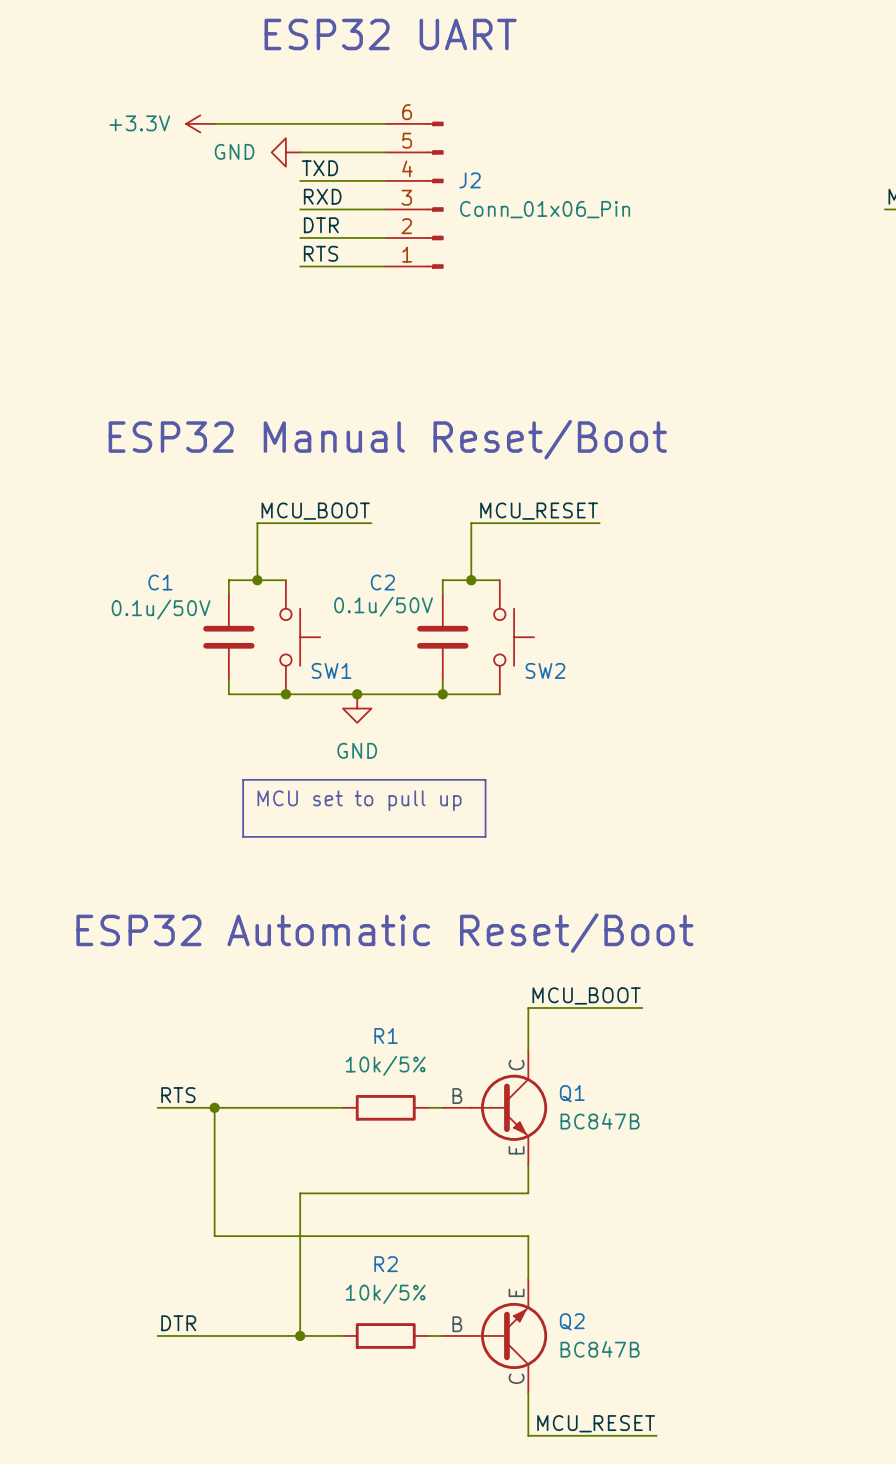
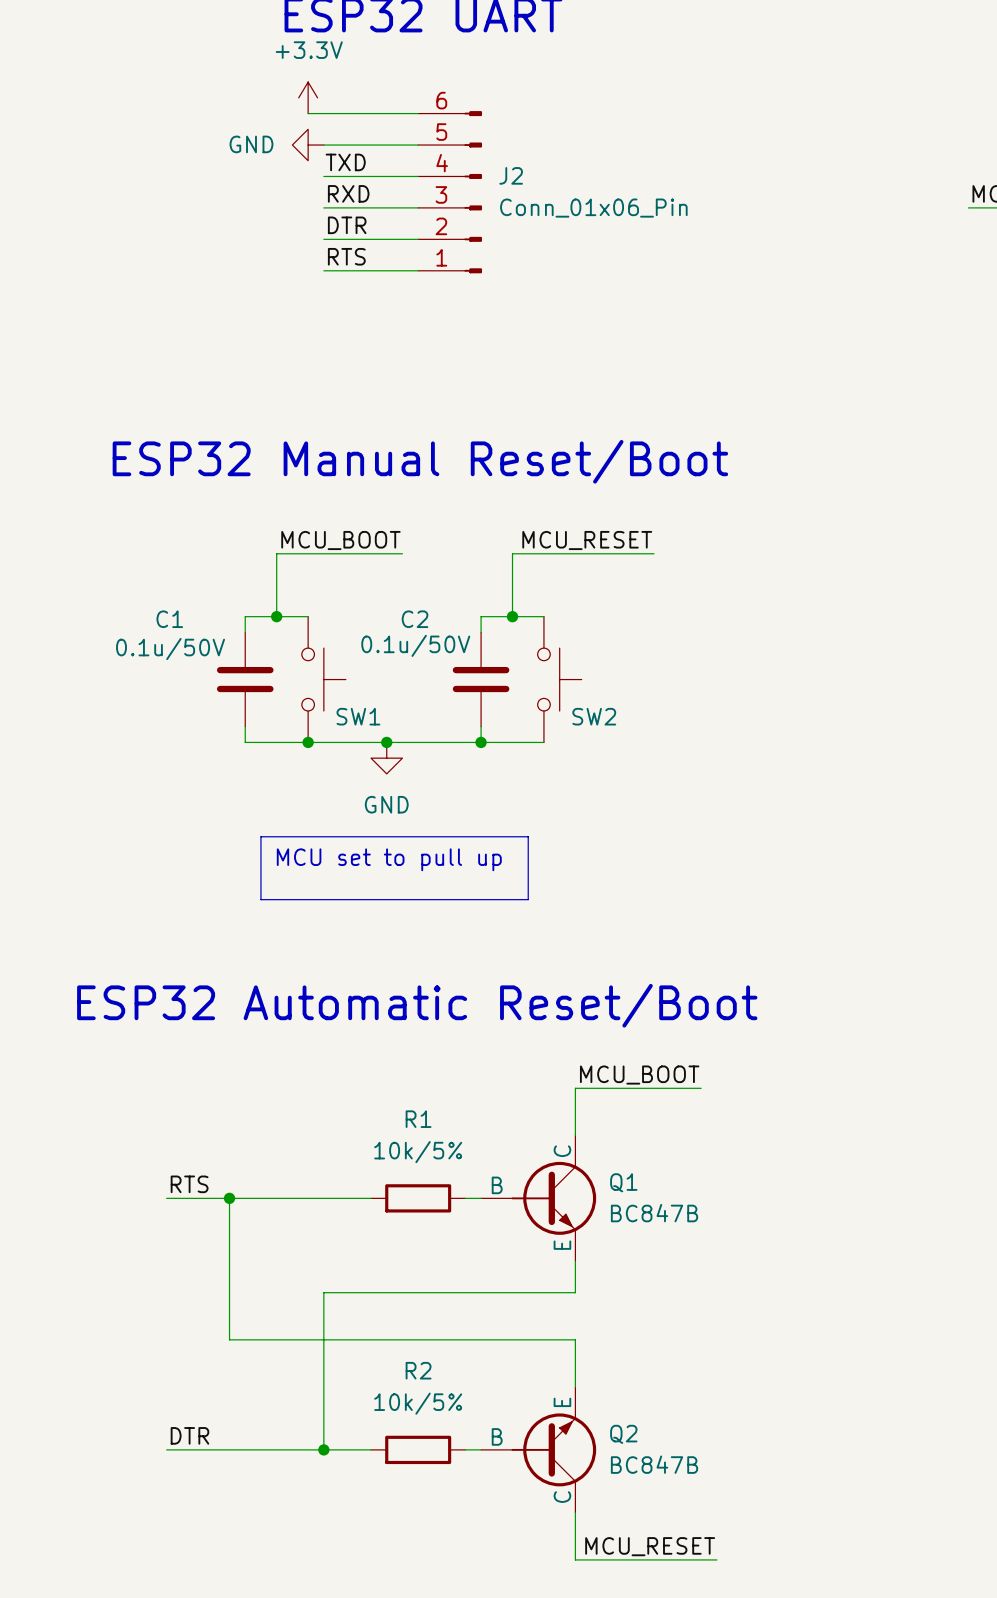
power symbol text position: +3.3V (139, 123) -> +3.3V (309, 50)
power symbol rotation: 0° (200, 123) -> 90° clockwise (308, 97)
power symbol position: +3.3V (200, 123) -> +3.3V (308, 97)
wire: (214, 123) (285, 123) -> none

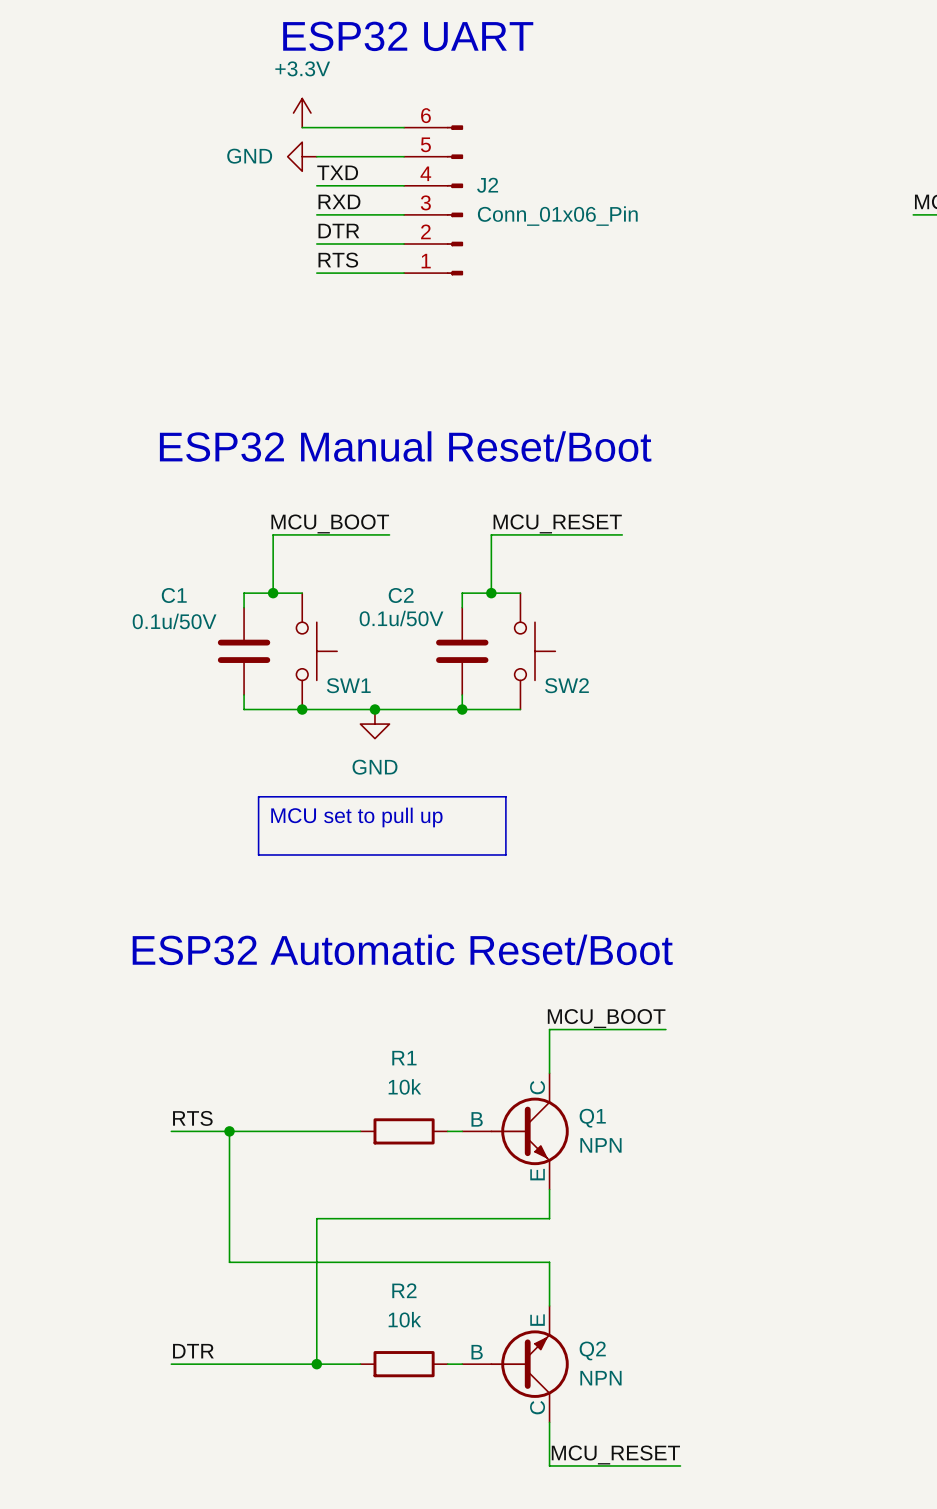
R1 value: 10k/5% (418, 1152) -> 10k (404, 1086)
Q1 value: BC847B (654, 1213) -> NPN (600, 1145)
R2 value: 10k/5% (418, 1403) -> 10k (404, 1319)
Q2 value: BC847B (654, 1464) -> NPN (600, 1378)

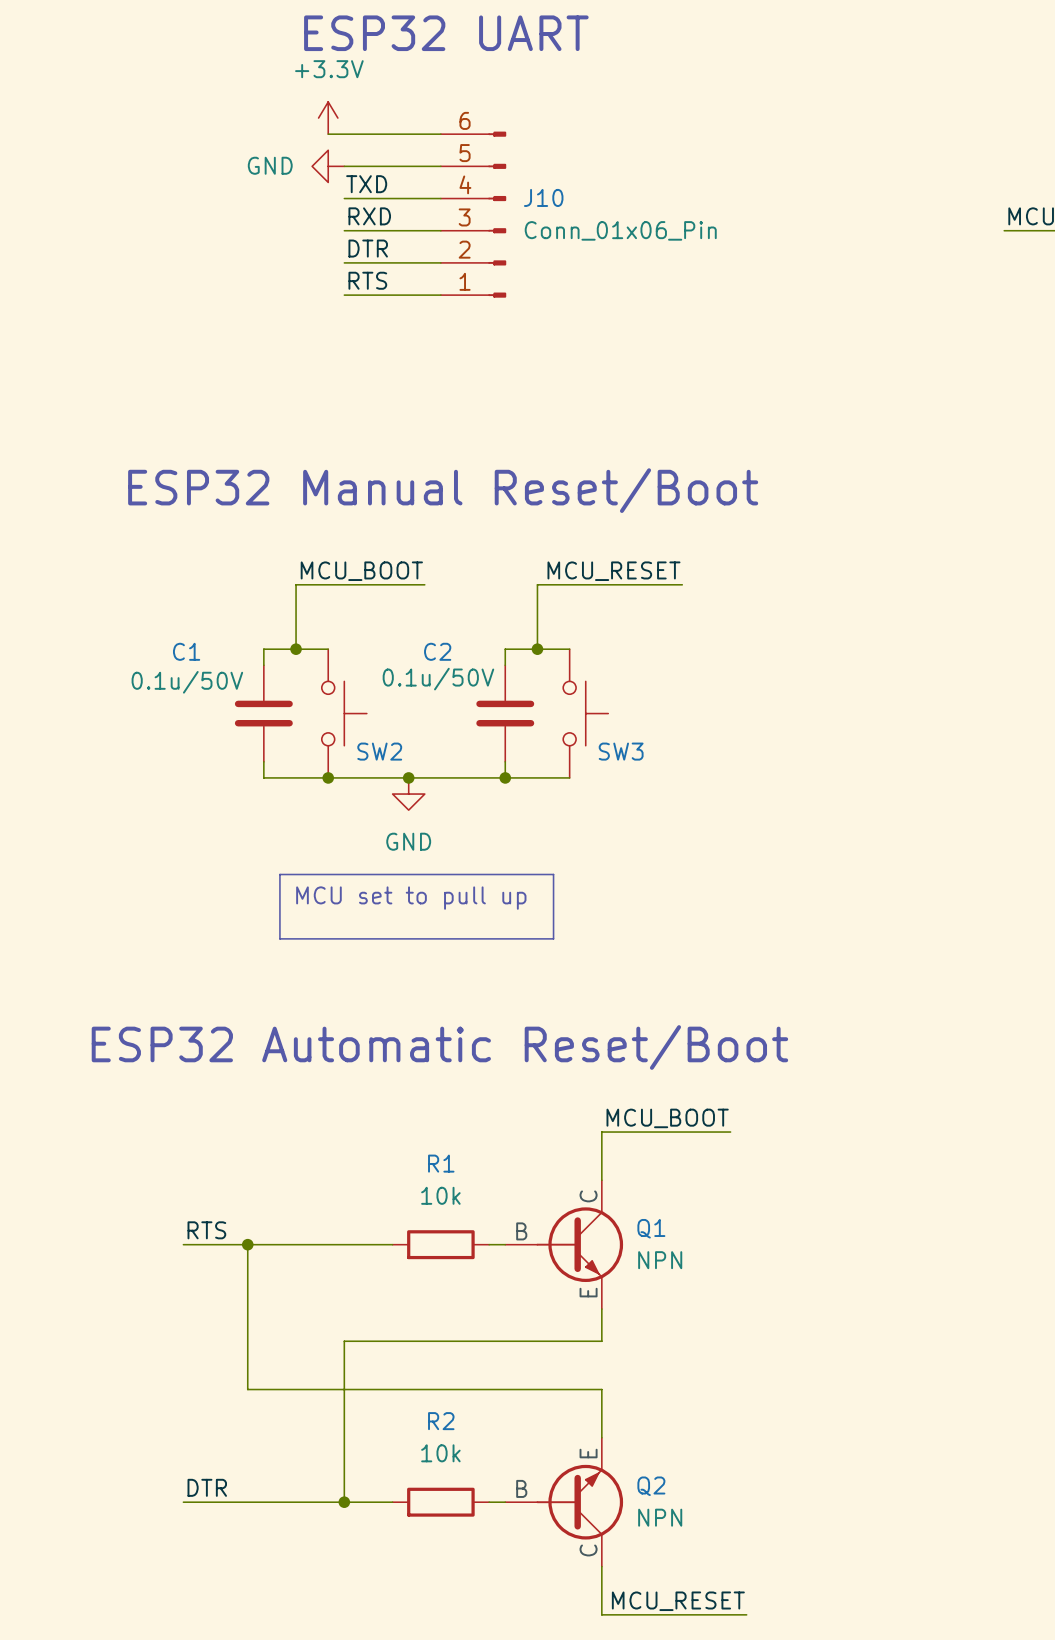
J2 name: J2 (487, 185) -> J10 (543, 197)
SW1 name: SW1 (348, 685) -> SW2 (379, 751)
SW2 name: SW2 (566, 685) -> SW3 (621, 751)

